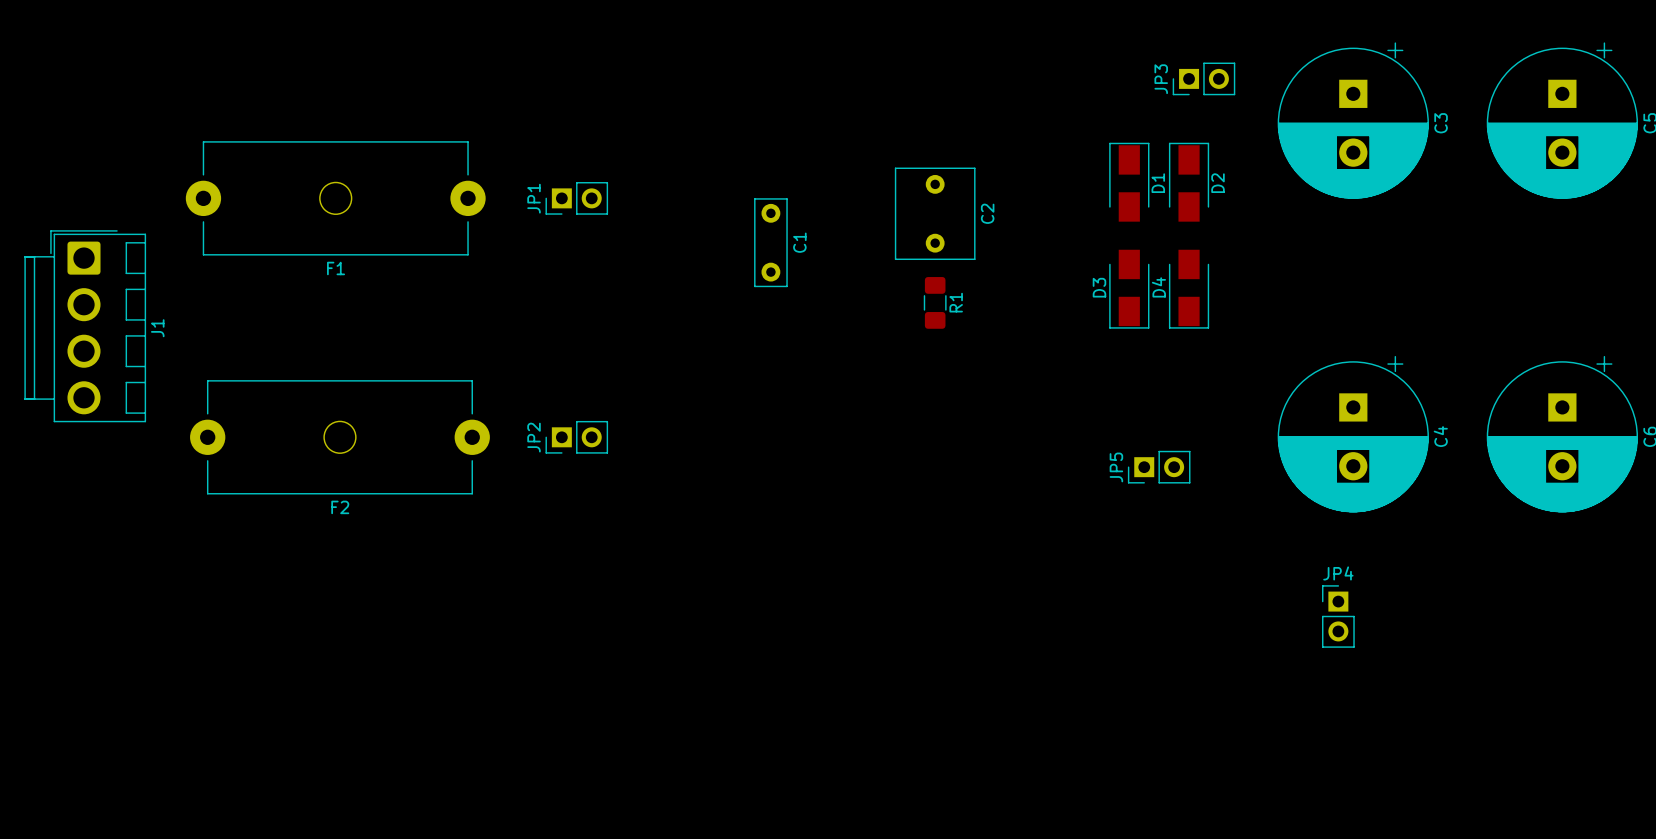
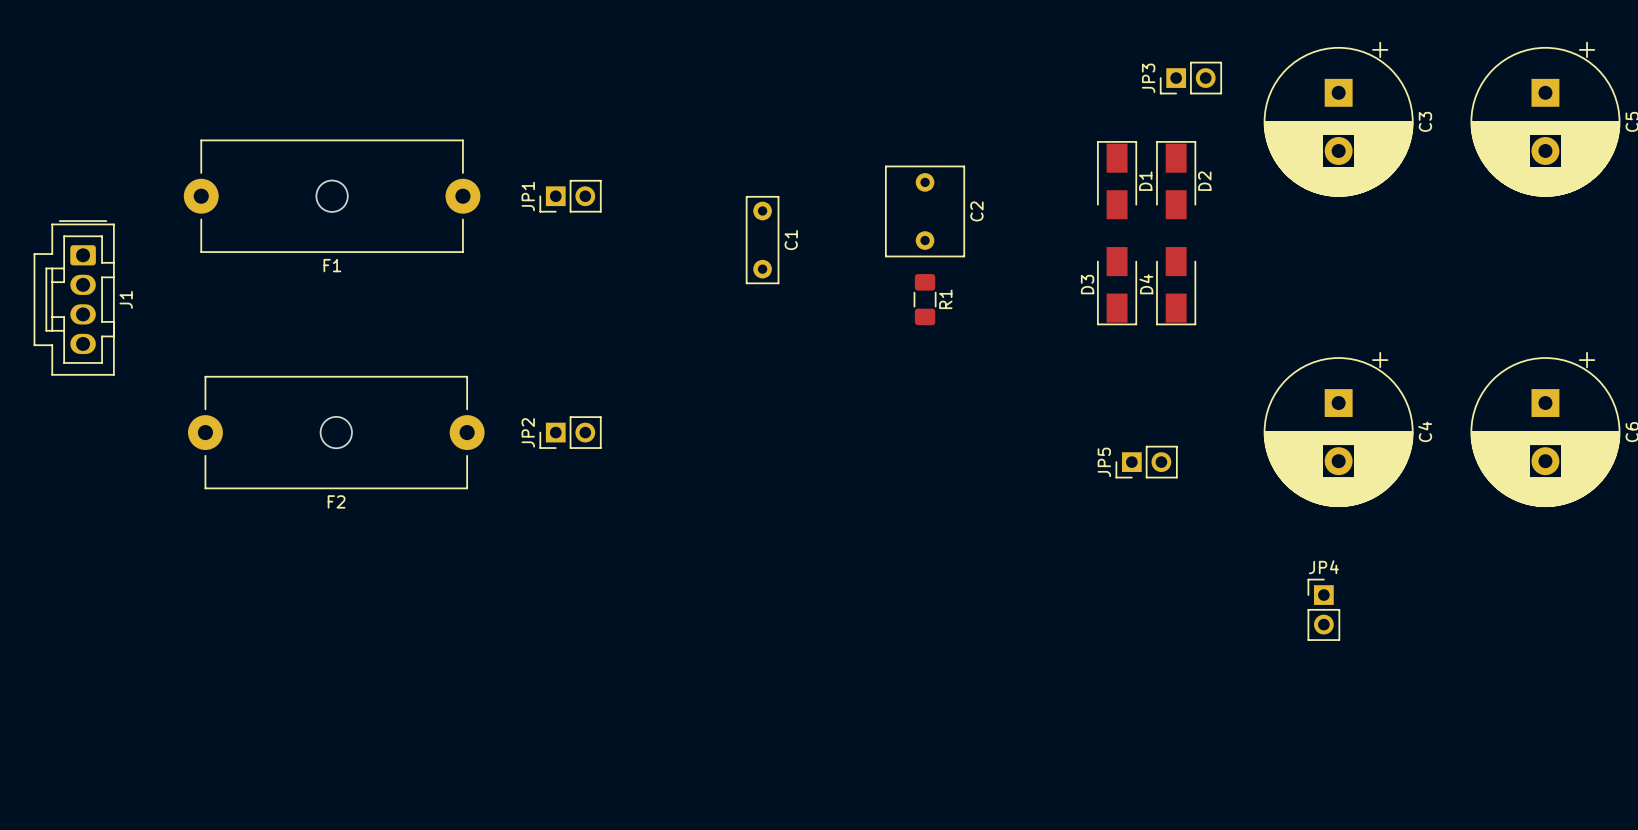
J1 footprint: [24, 230, 147, 423] -> [33, 220, 115, 376]

